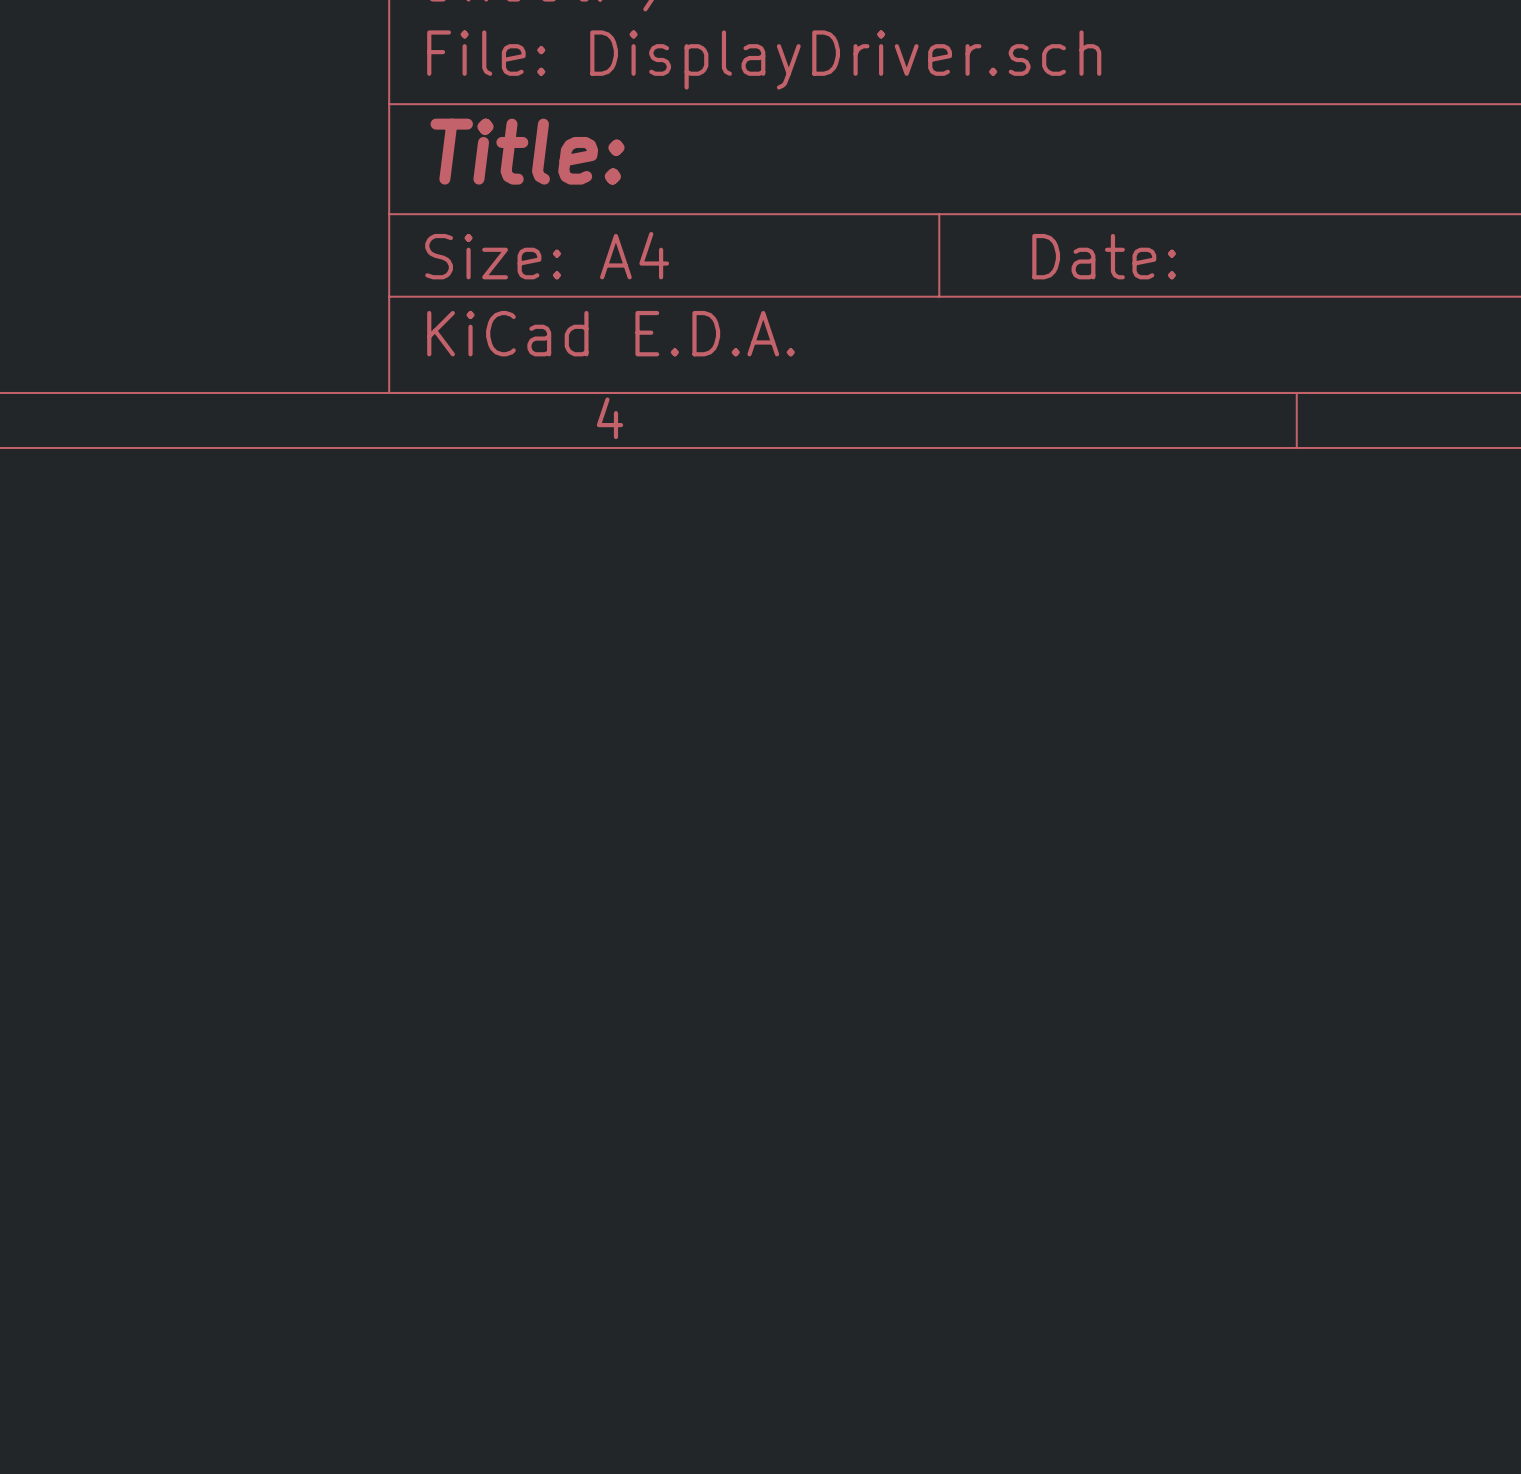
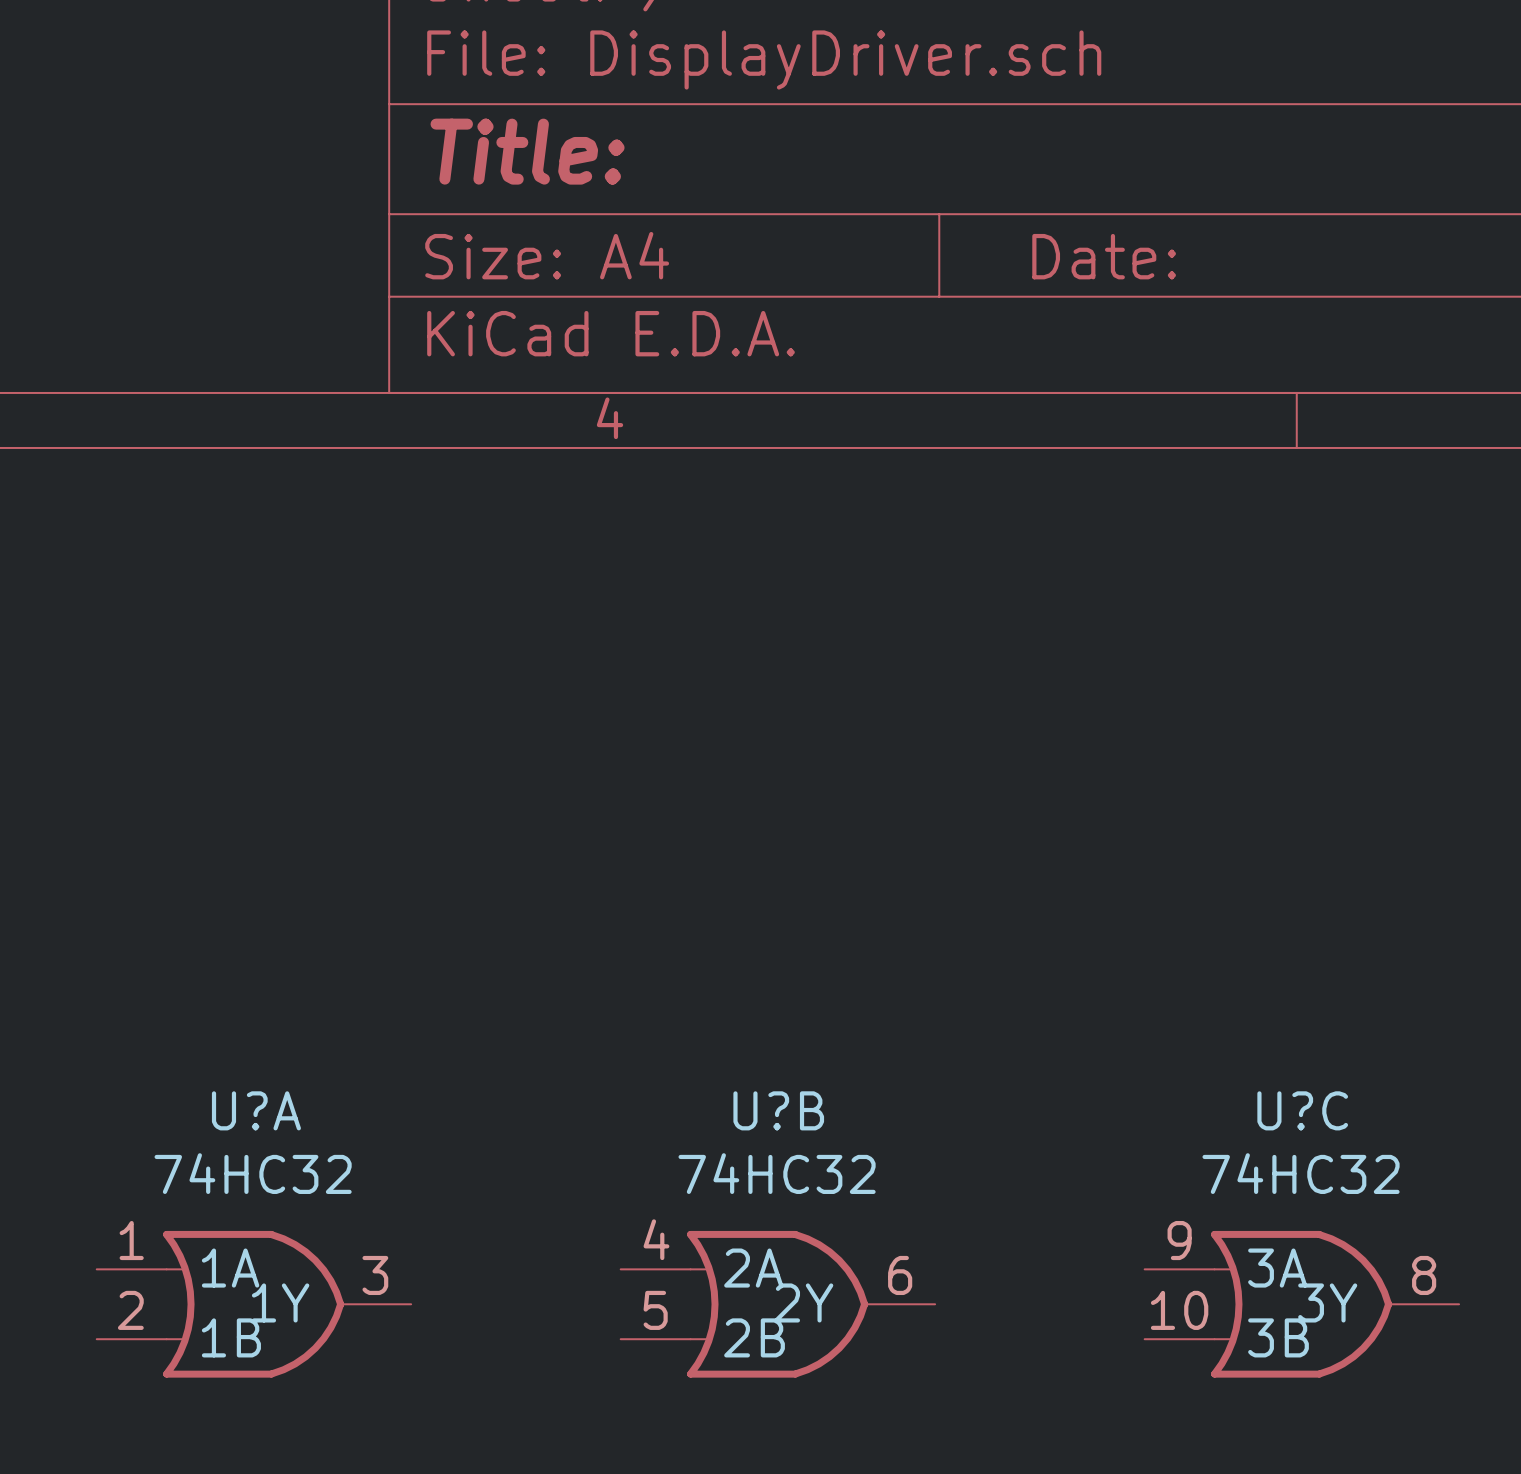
U?A: none -> 74HC32 (253, 1304)
U?B: none -> 74HC32 (777, 1304)
U?C: none -> 74HC32 (1301, 1304)

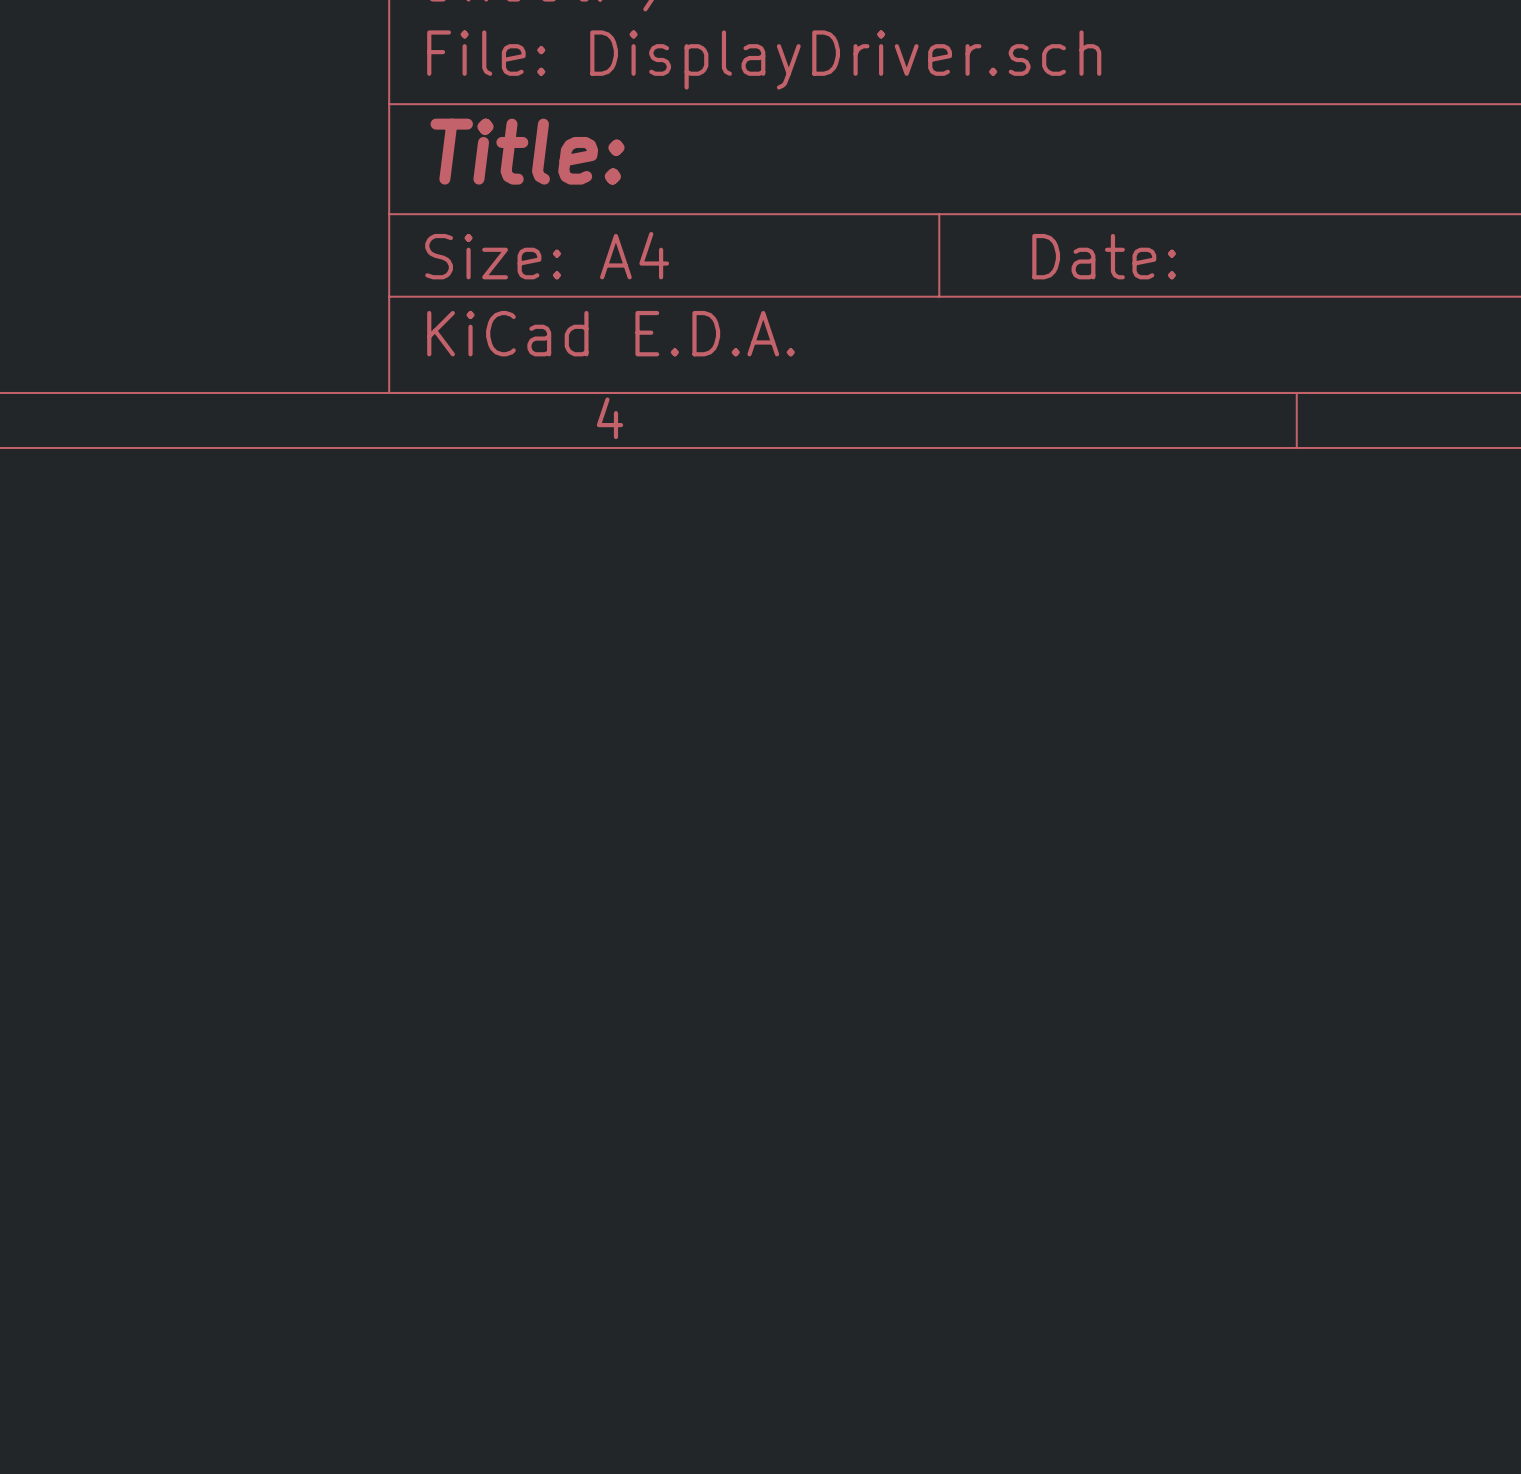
U?A: 74HC32 (253, 1304) -> none
U?B: 74HC32 (777, 1304) -> none
U?C: 74HC32 (1301, 1304) -> none

